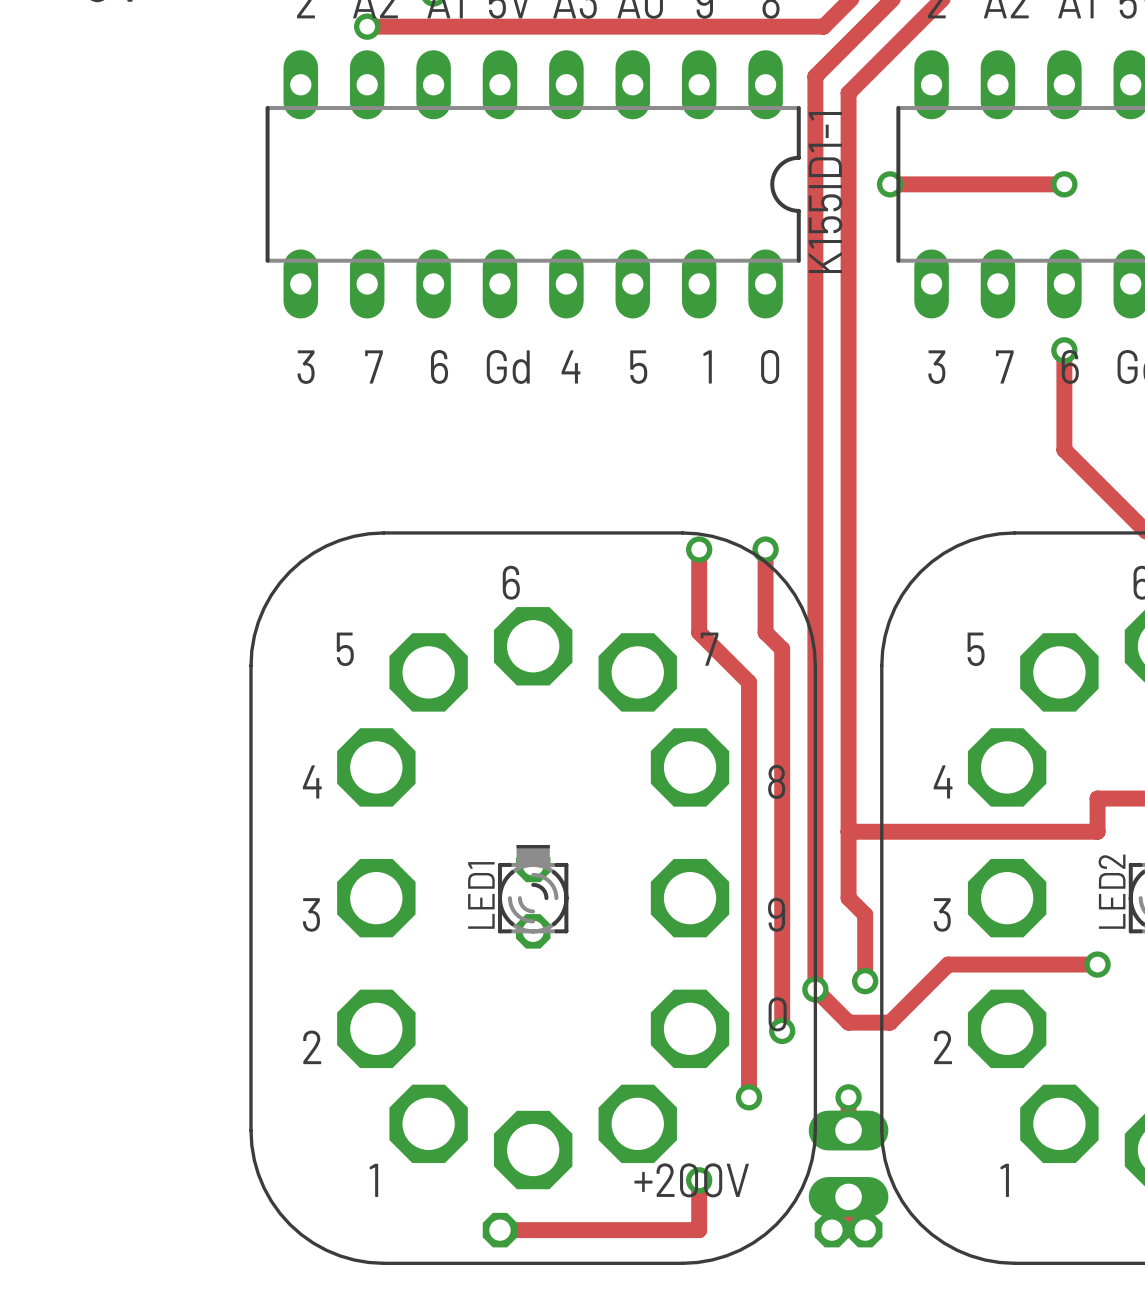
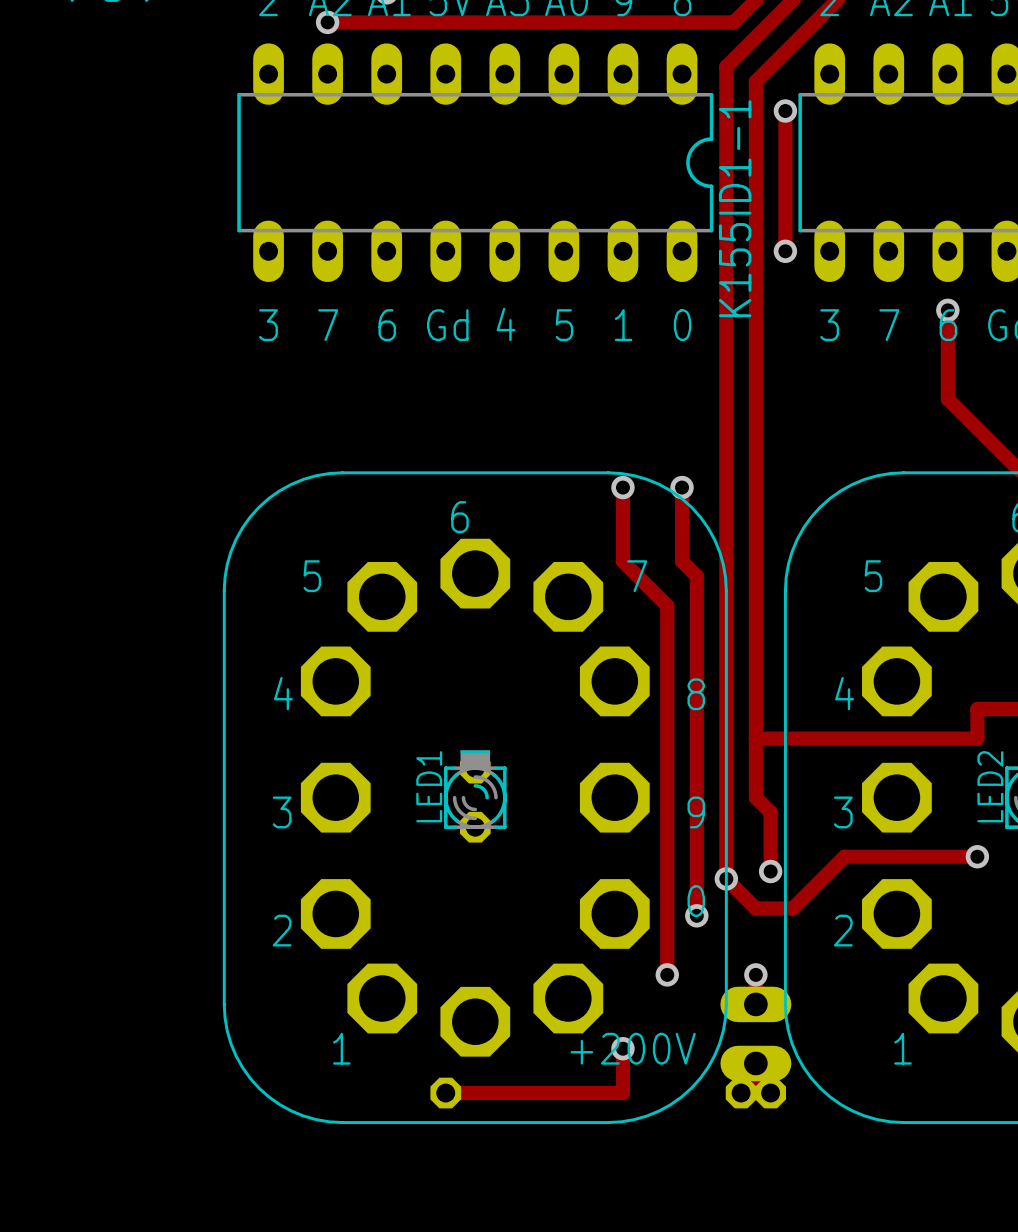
track: none -> (785, 111) (785, 251)
via: none -> (785, 111)
track: (890, 184) (1064, 184) -> none
via: (890, 184) -> none
via: (1064, 184) -> none
via: none -> (785, 251)

